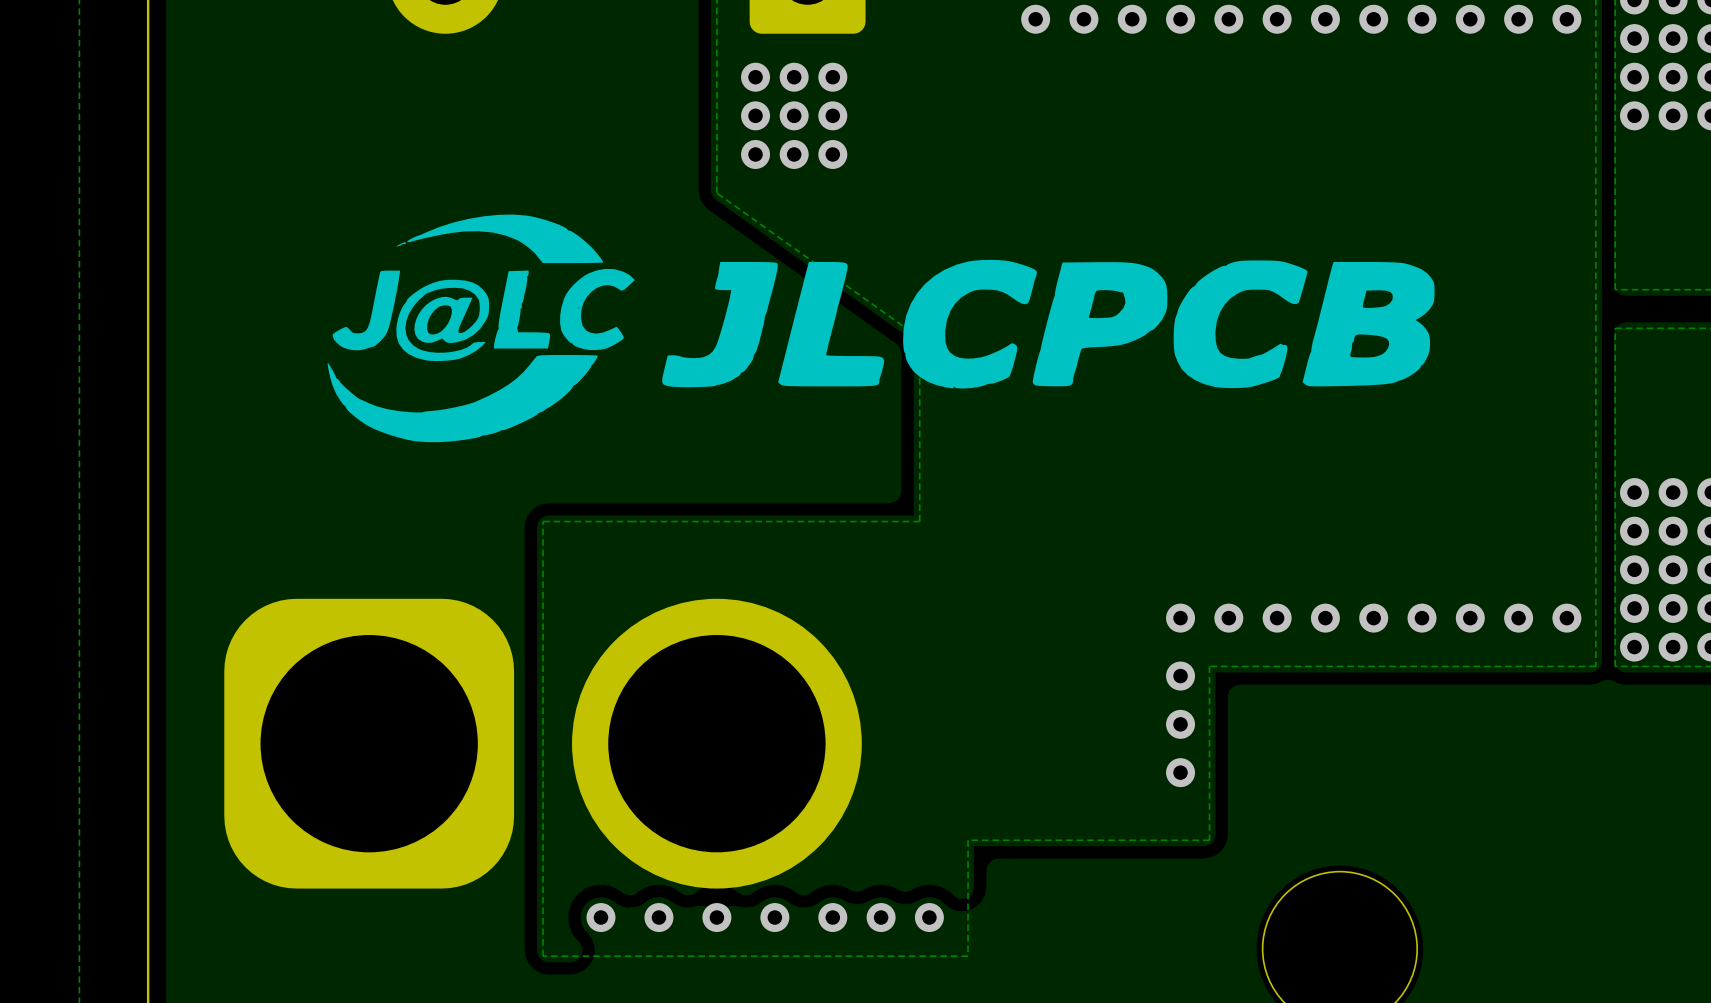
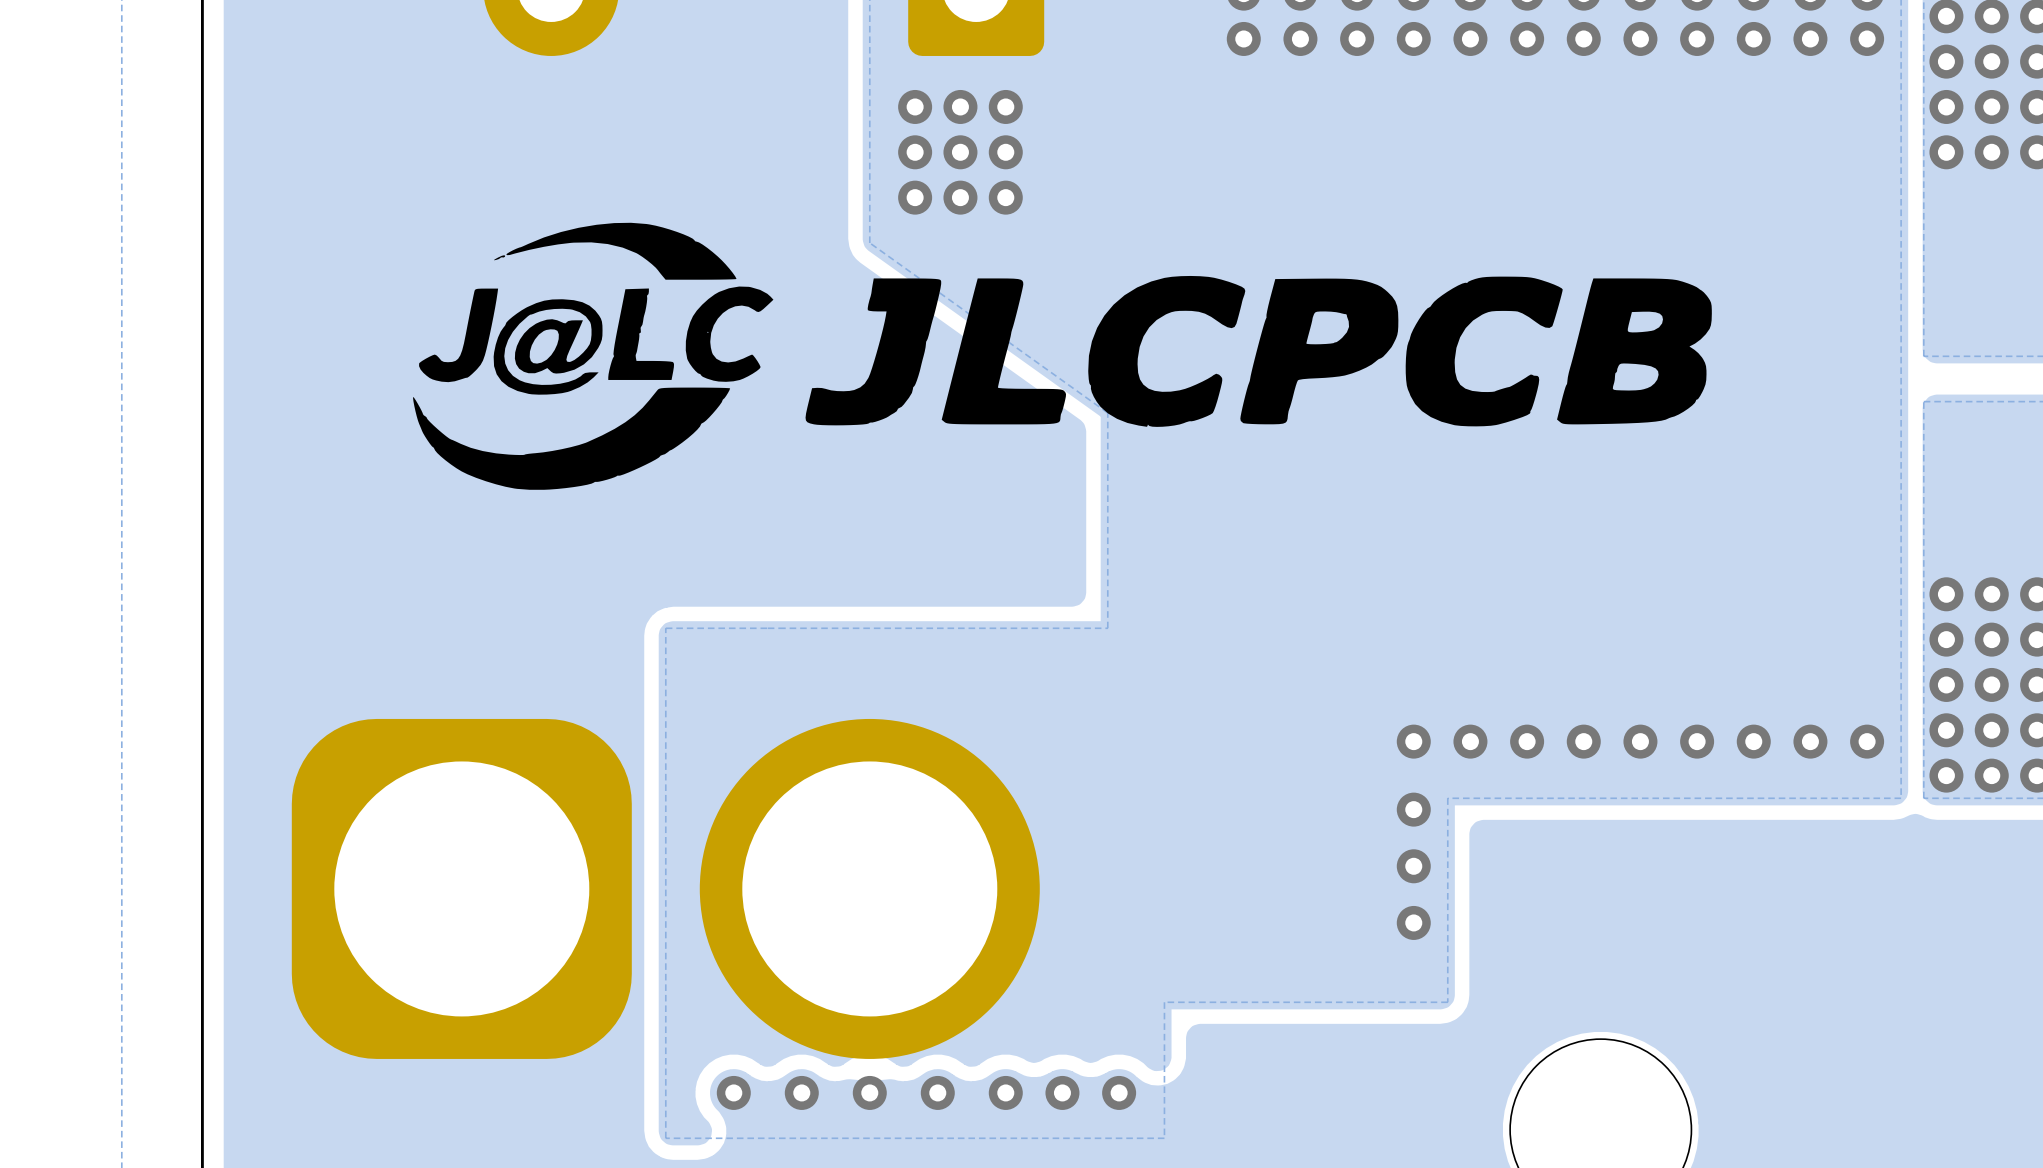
drawing position: (881, 328) -> (1062, 356)

